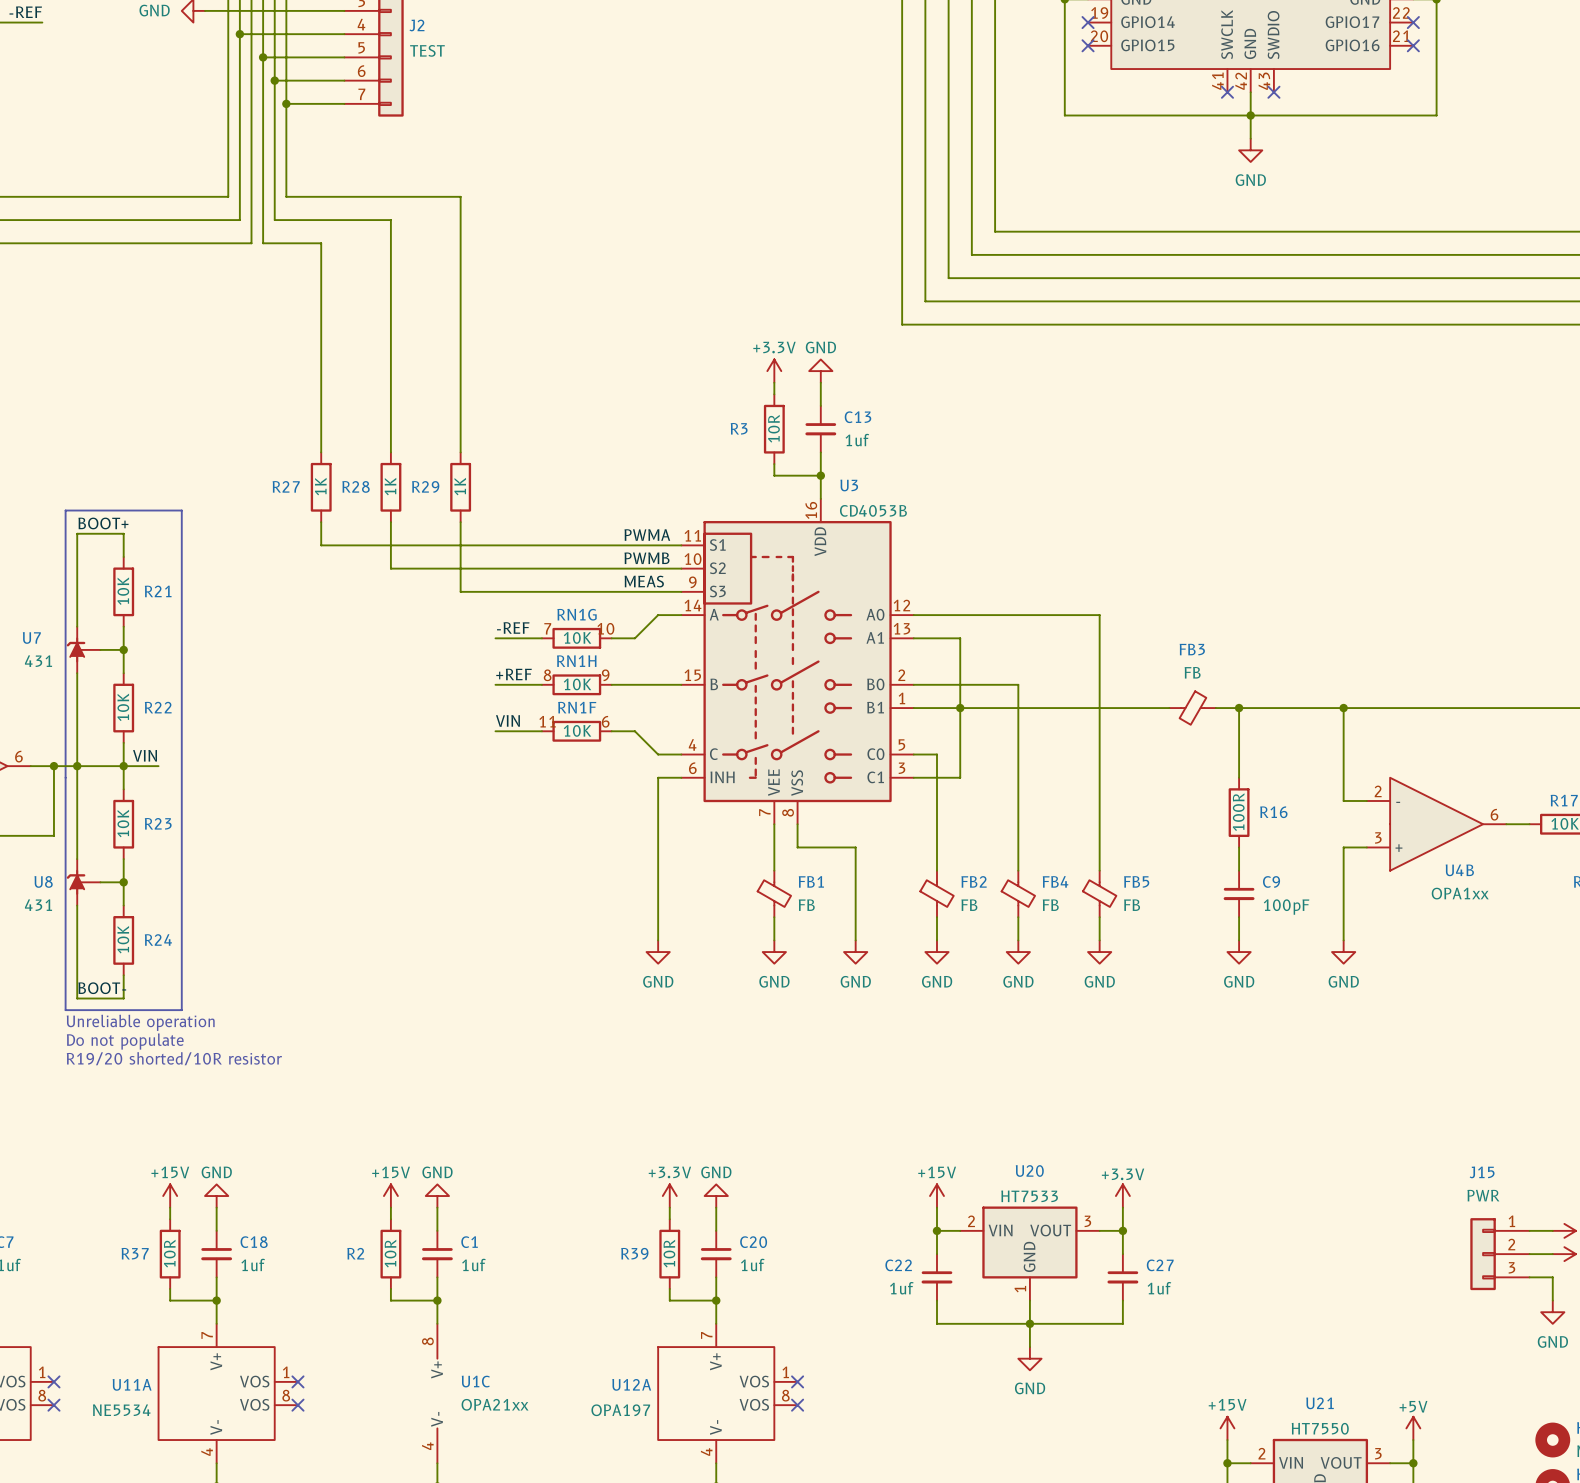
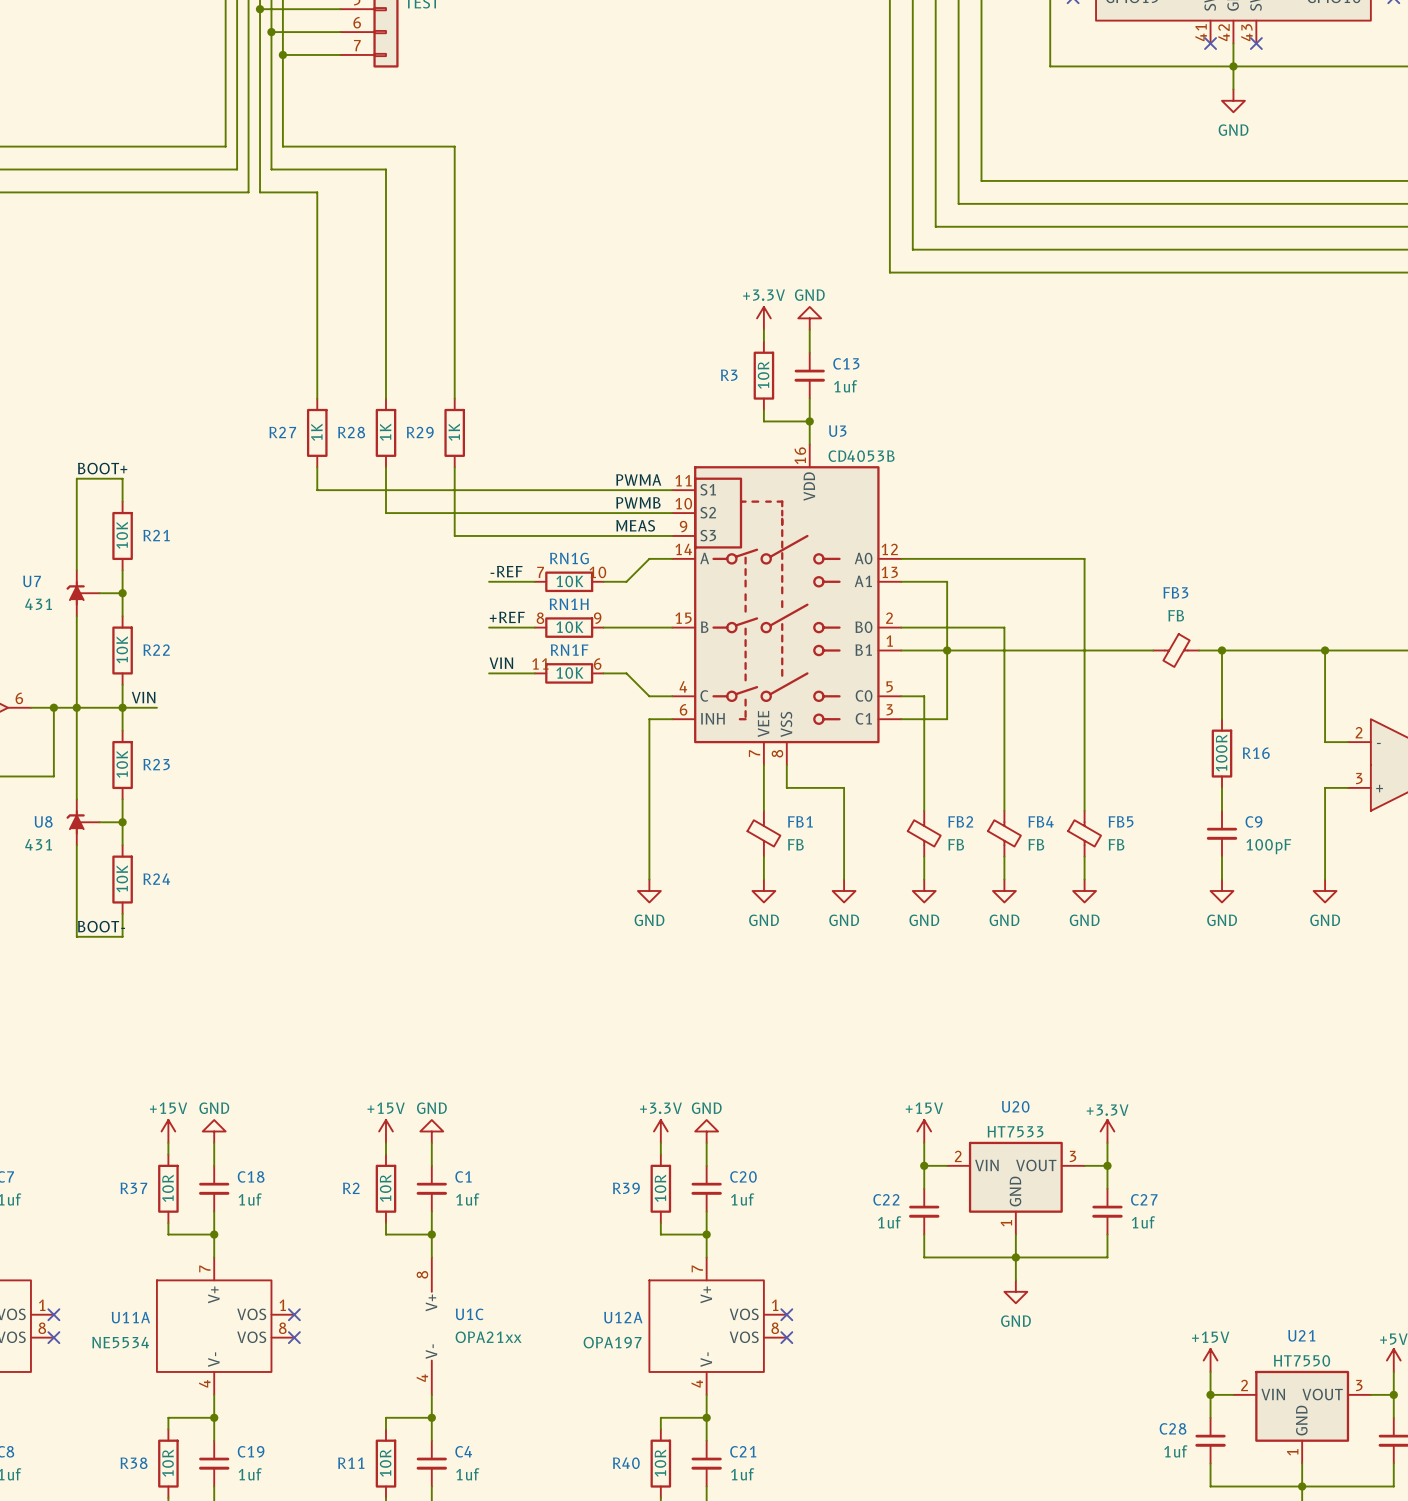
line: (65, 510) (65, 1010) (181, 1010) (181, 510) (65, 510) -> none
text: Unreliable operation (140, 1022) -> none
text: Do not populate (125, 1041) -> none
text: R19/20 shorted/10R resistor (174, 1058) -> none

